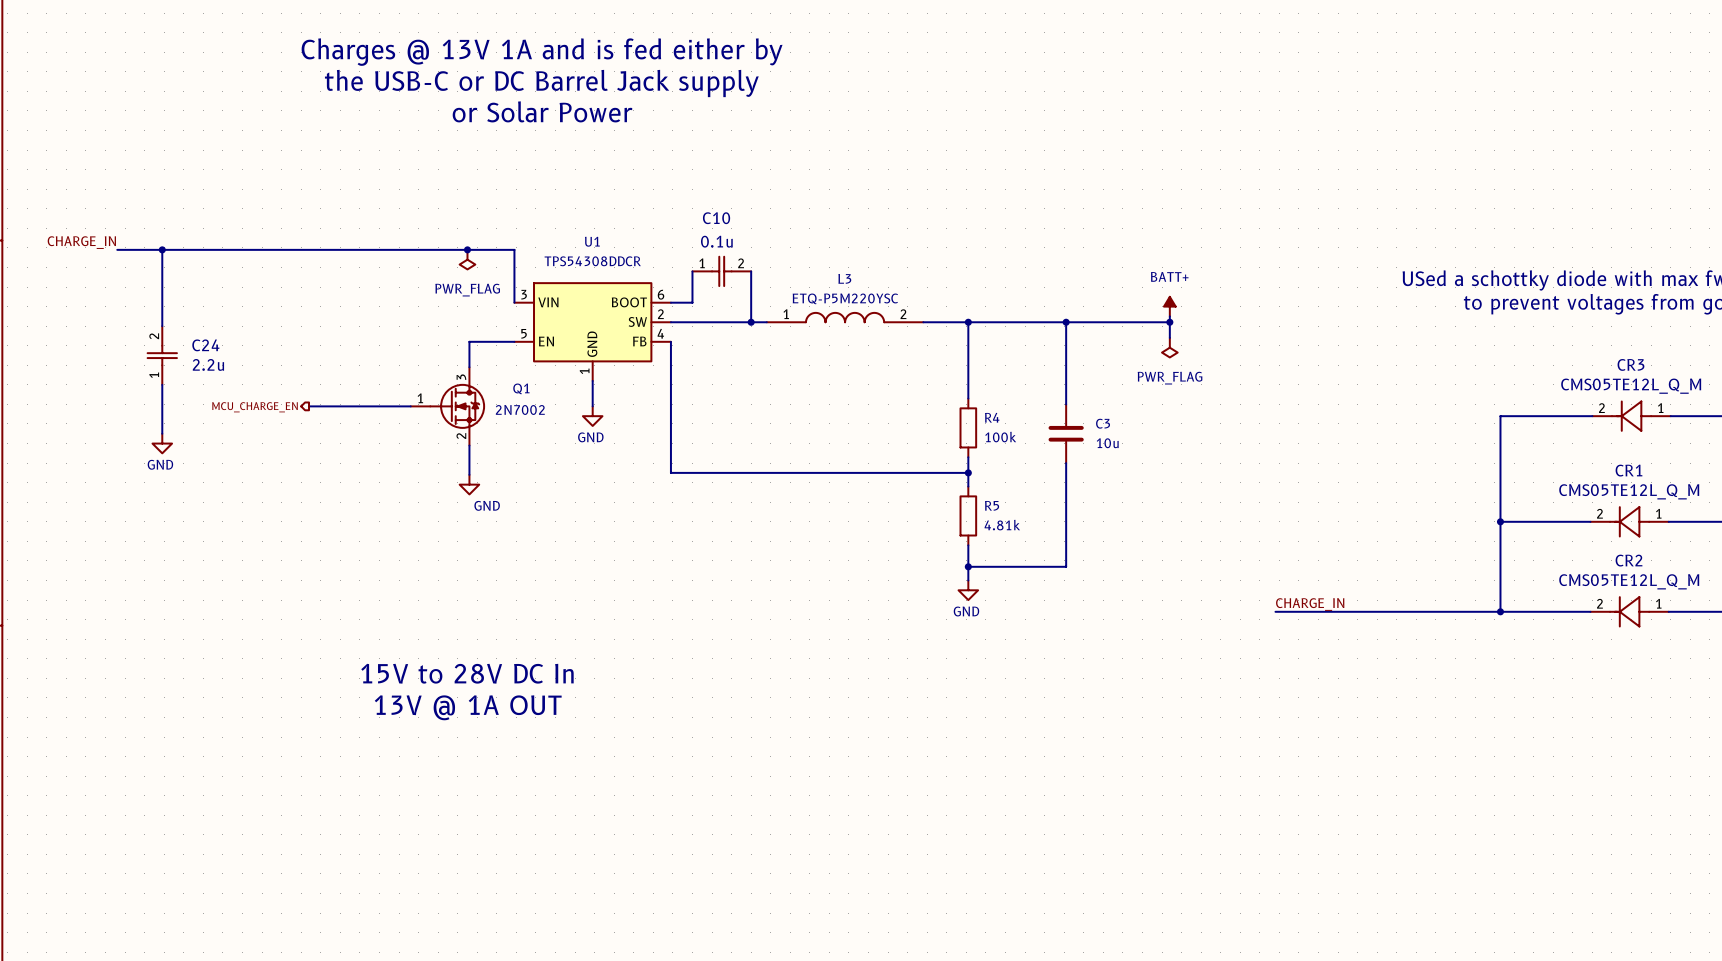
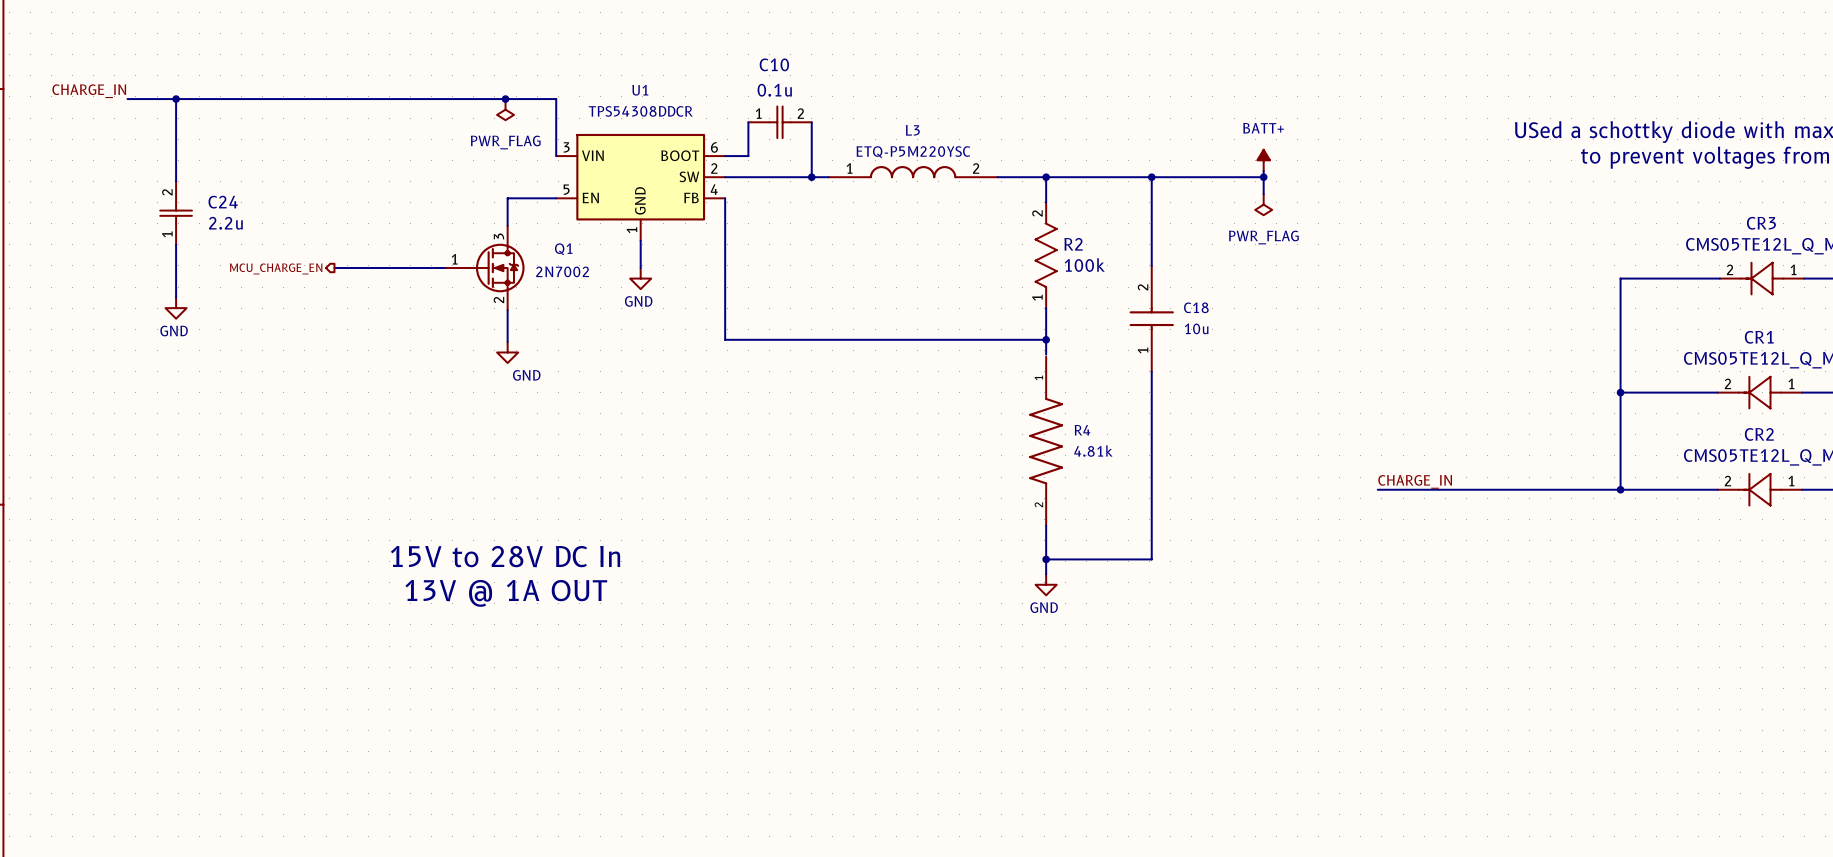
R2: none -> 100k (1046, 255)
R4 symbol: [959, 398, 978, 458] -> [1029, 356, 1064, 526]
C3: 10u (1066, 433) -> none
R4 value: 100k (1000, 437) -> 4.81k (1093, 451)
C18: none -> 10u (1151, 318)
R5: 4.81k (968, 515) -> none
wire: (968, 545) (968, 580) -> none
wire: (968, 566) (1066, 566) -> (1046, 559) (1151, 559) (1151, 441)
junction: (968, 566) -> none
power symbol position: GND (968, 590) -> GND (1046, 584)
wire: none -> (1046, 525) (1046, 574)
junction: none -> (1046, 559)

